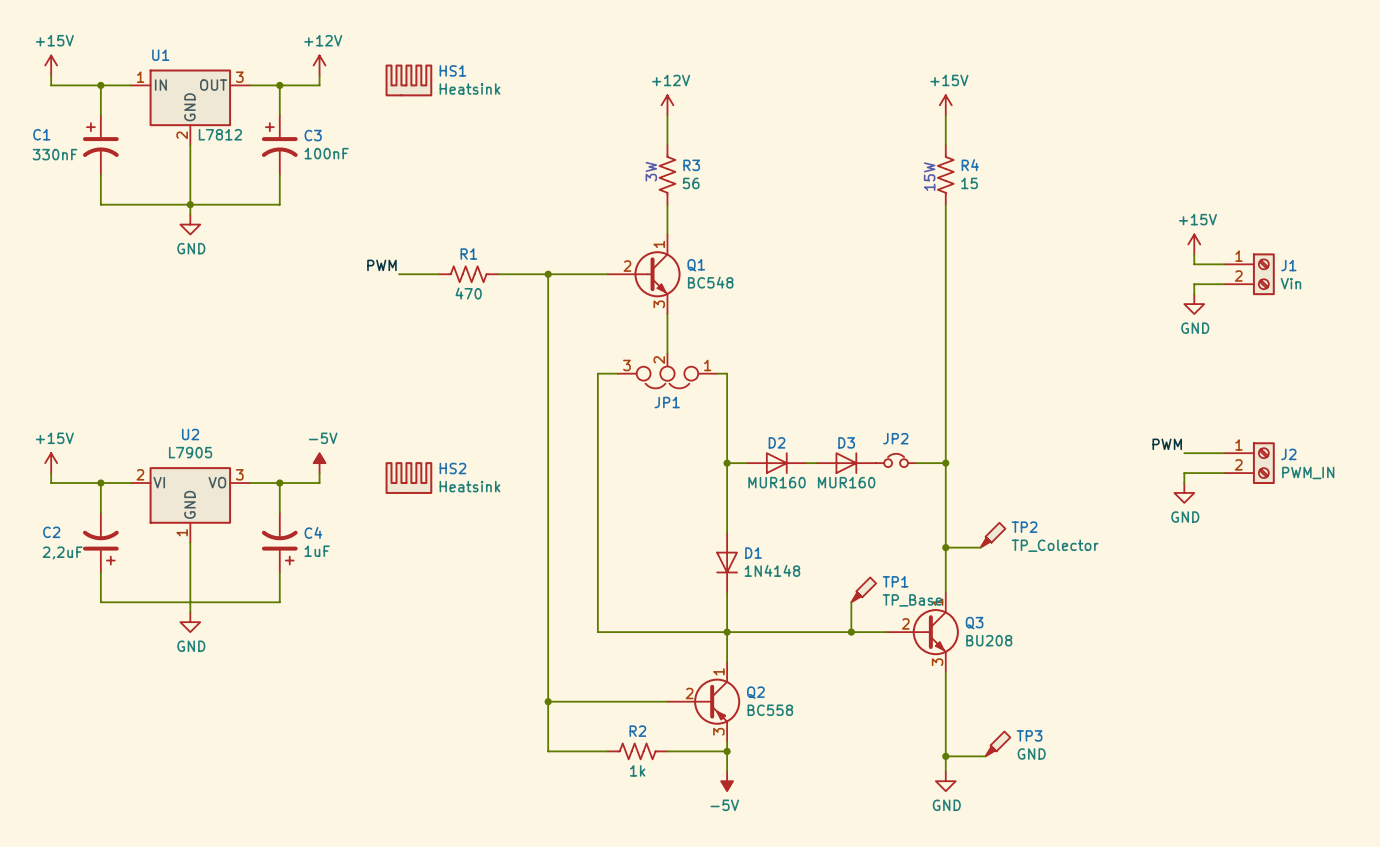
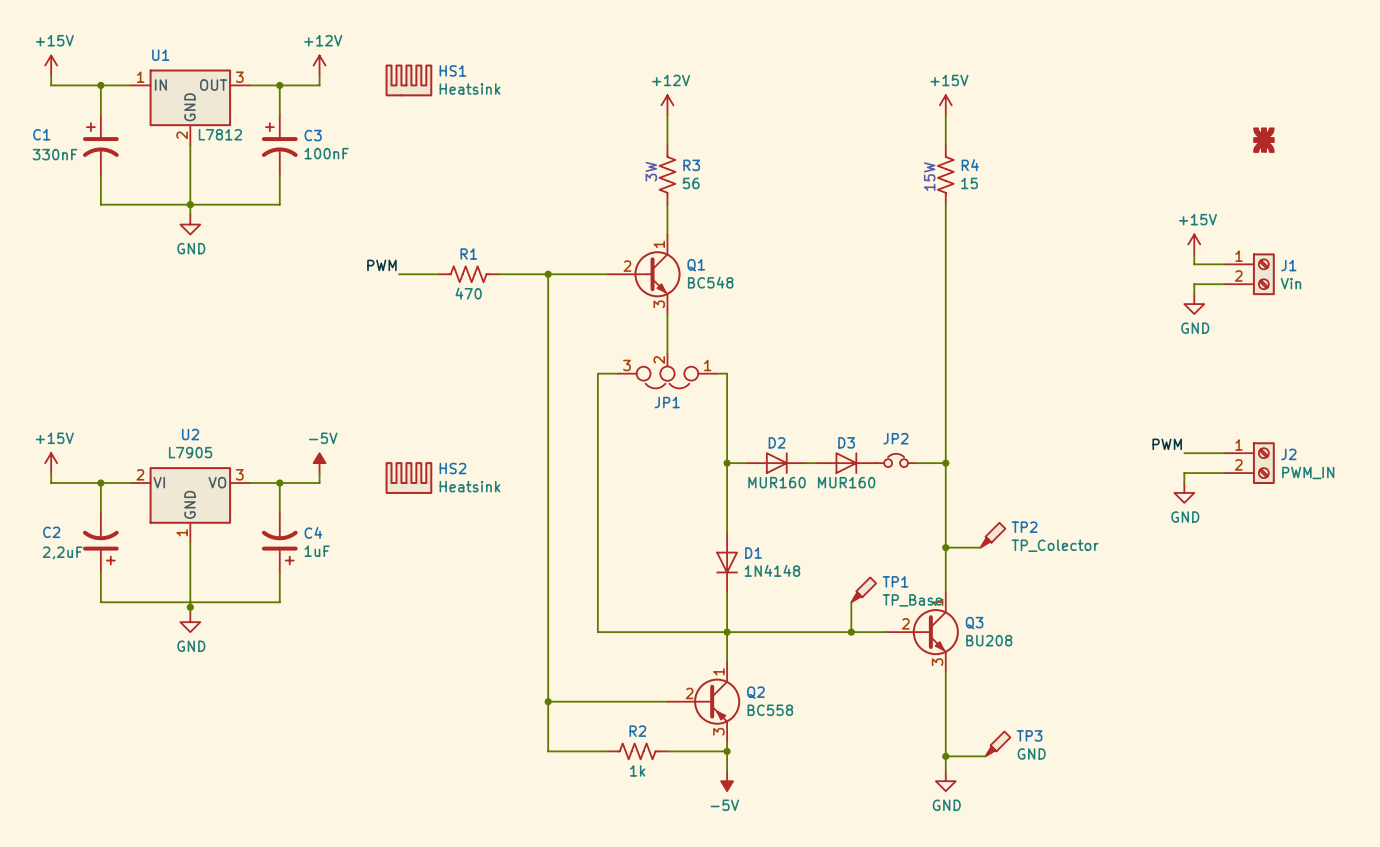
part: none -> (1263, 140)
junction: none -> (190, 607)

